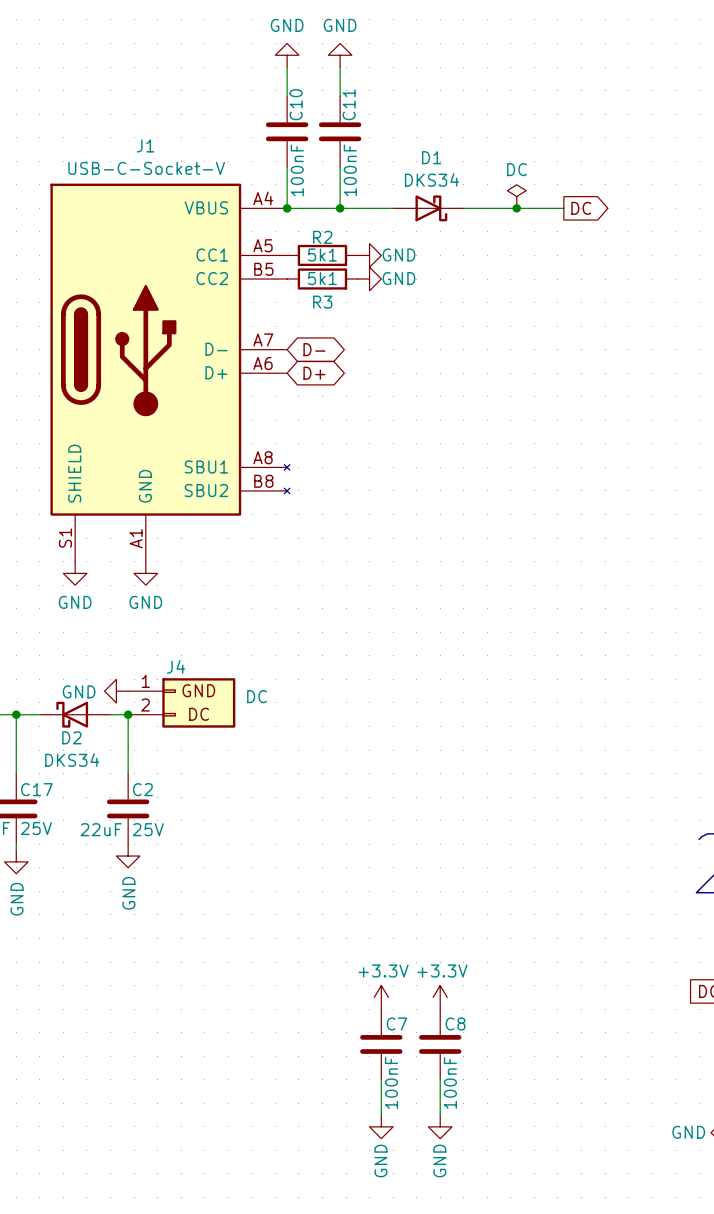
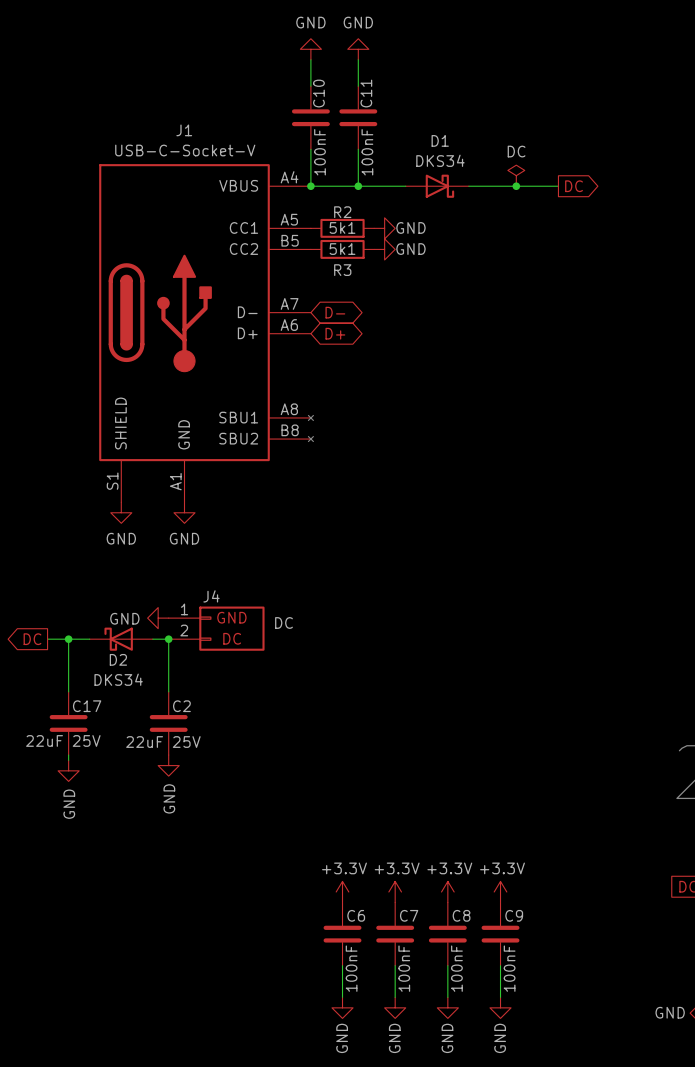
power symbol: none -> +3.3V (342, 891)
power symbol: none -> +3.3V (500, 891)
C6: none -> 100nF (342, 934)
C9: none -> 100nF (500, 934)
wire: none -> (342, 965) (342, 997)
wire: none -> (500, 965) (500, 997)
power symbol: none -> GND (342, 1007)
power symbol: none -> GND (500, 1007)

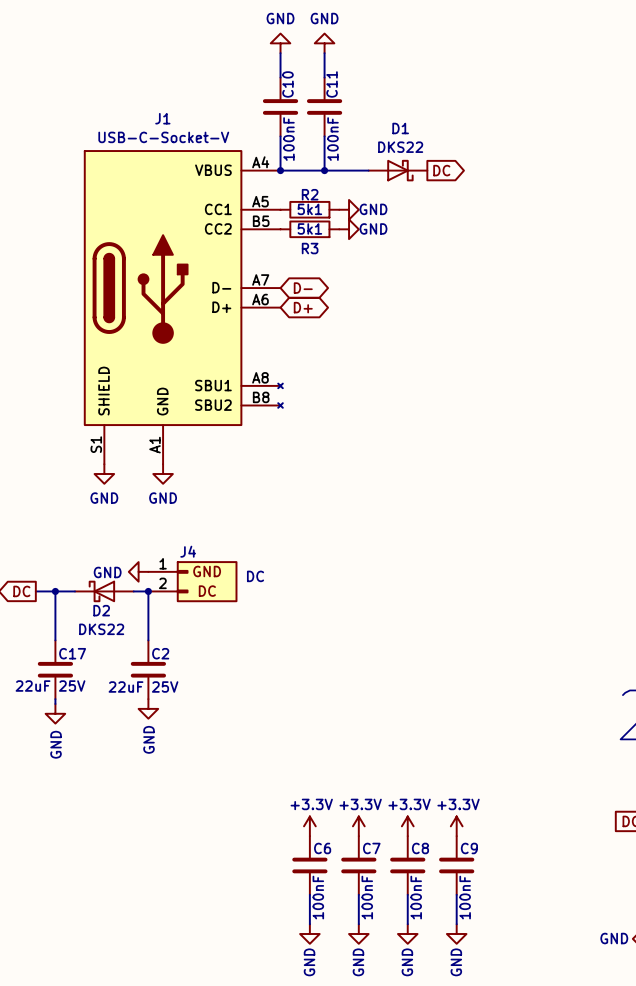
D1 value: DKS34 (440, 160) -> DKS22 (400, 147)
power symbol: DC (516, 175) -> none
wire: (468, 186) (558, 186) -> none
junction: (516, 186) -> none
global label position: DC (574, 186) -> DC (441, 170)
D2 value: DKS34 (118, 679) -> DKS22 (101, 629)

